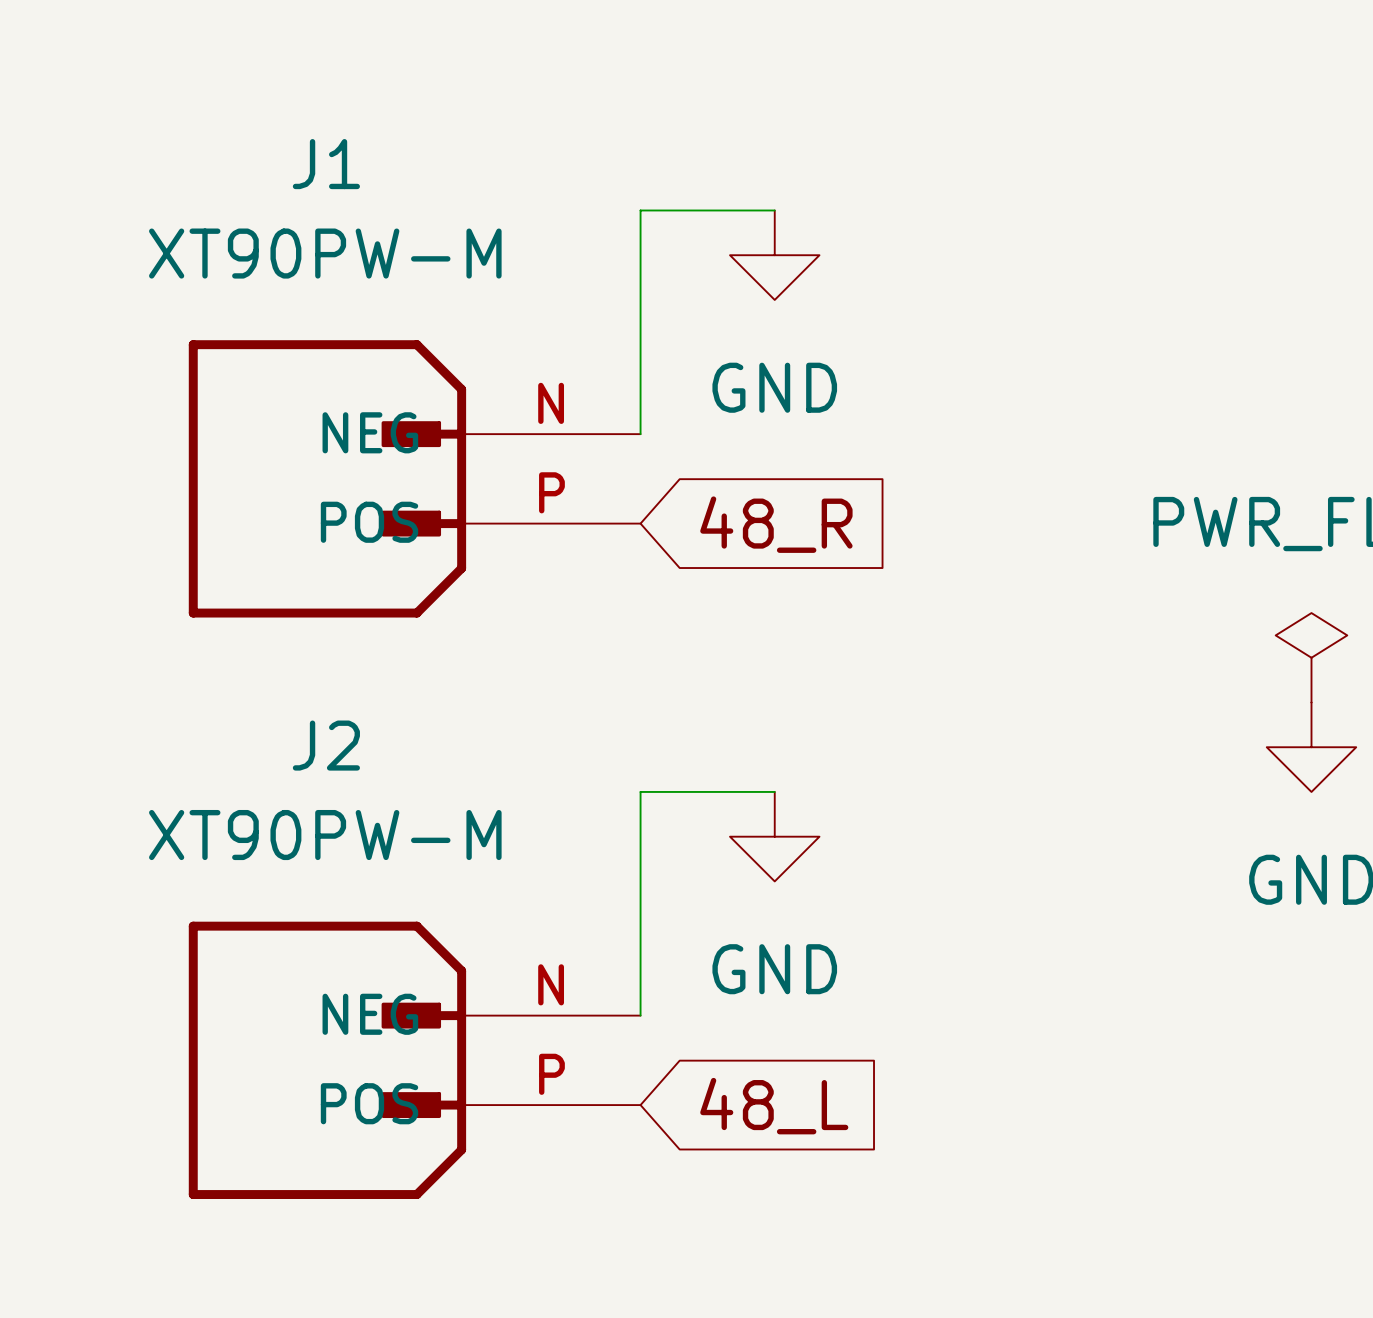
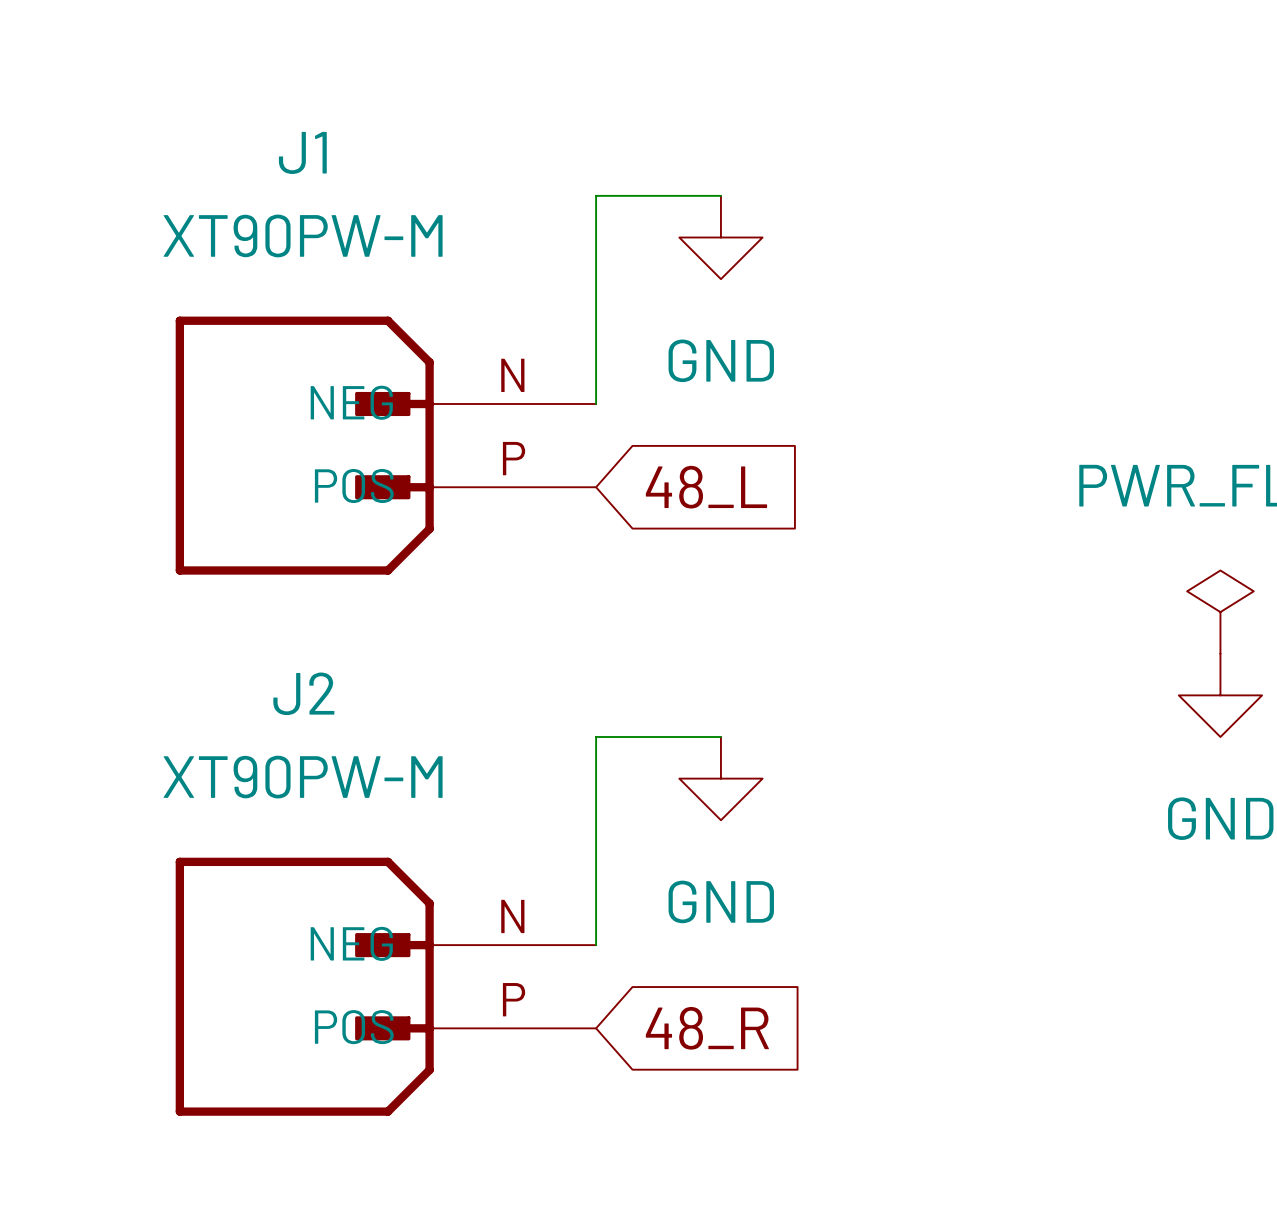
global label: 48_R (776, 524) -> 48_L (706, 487)
global label: 48_L (774, 1106) -> 48_R (707, 1028)

